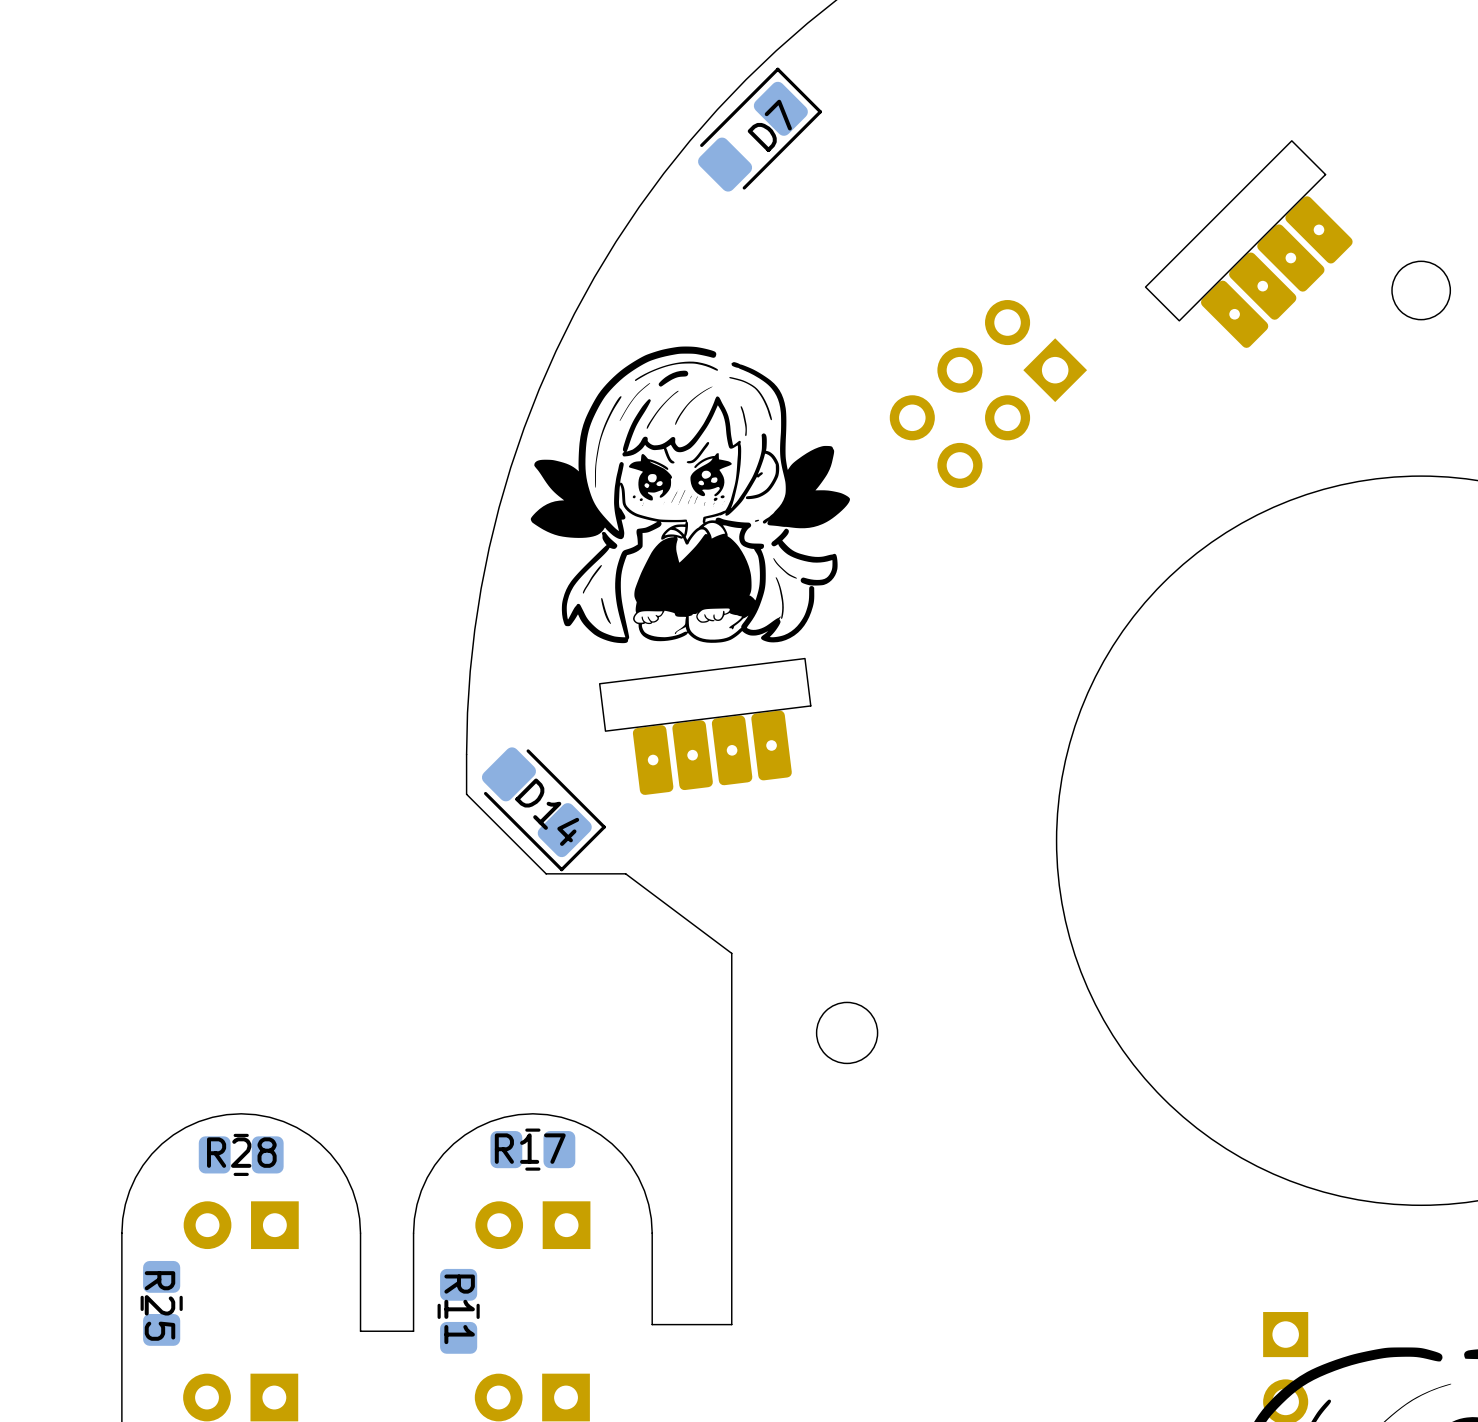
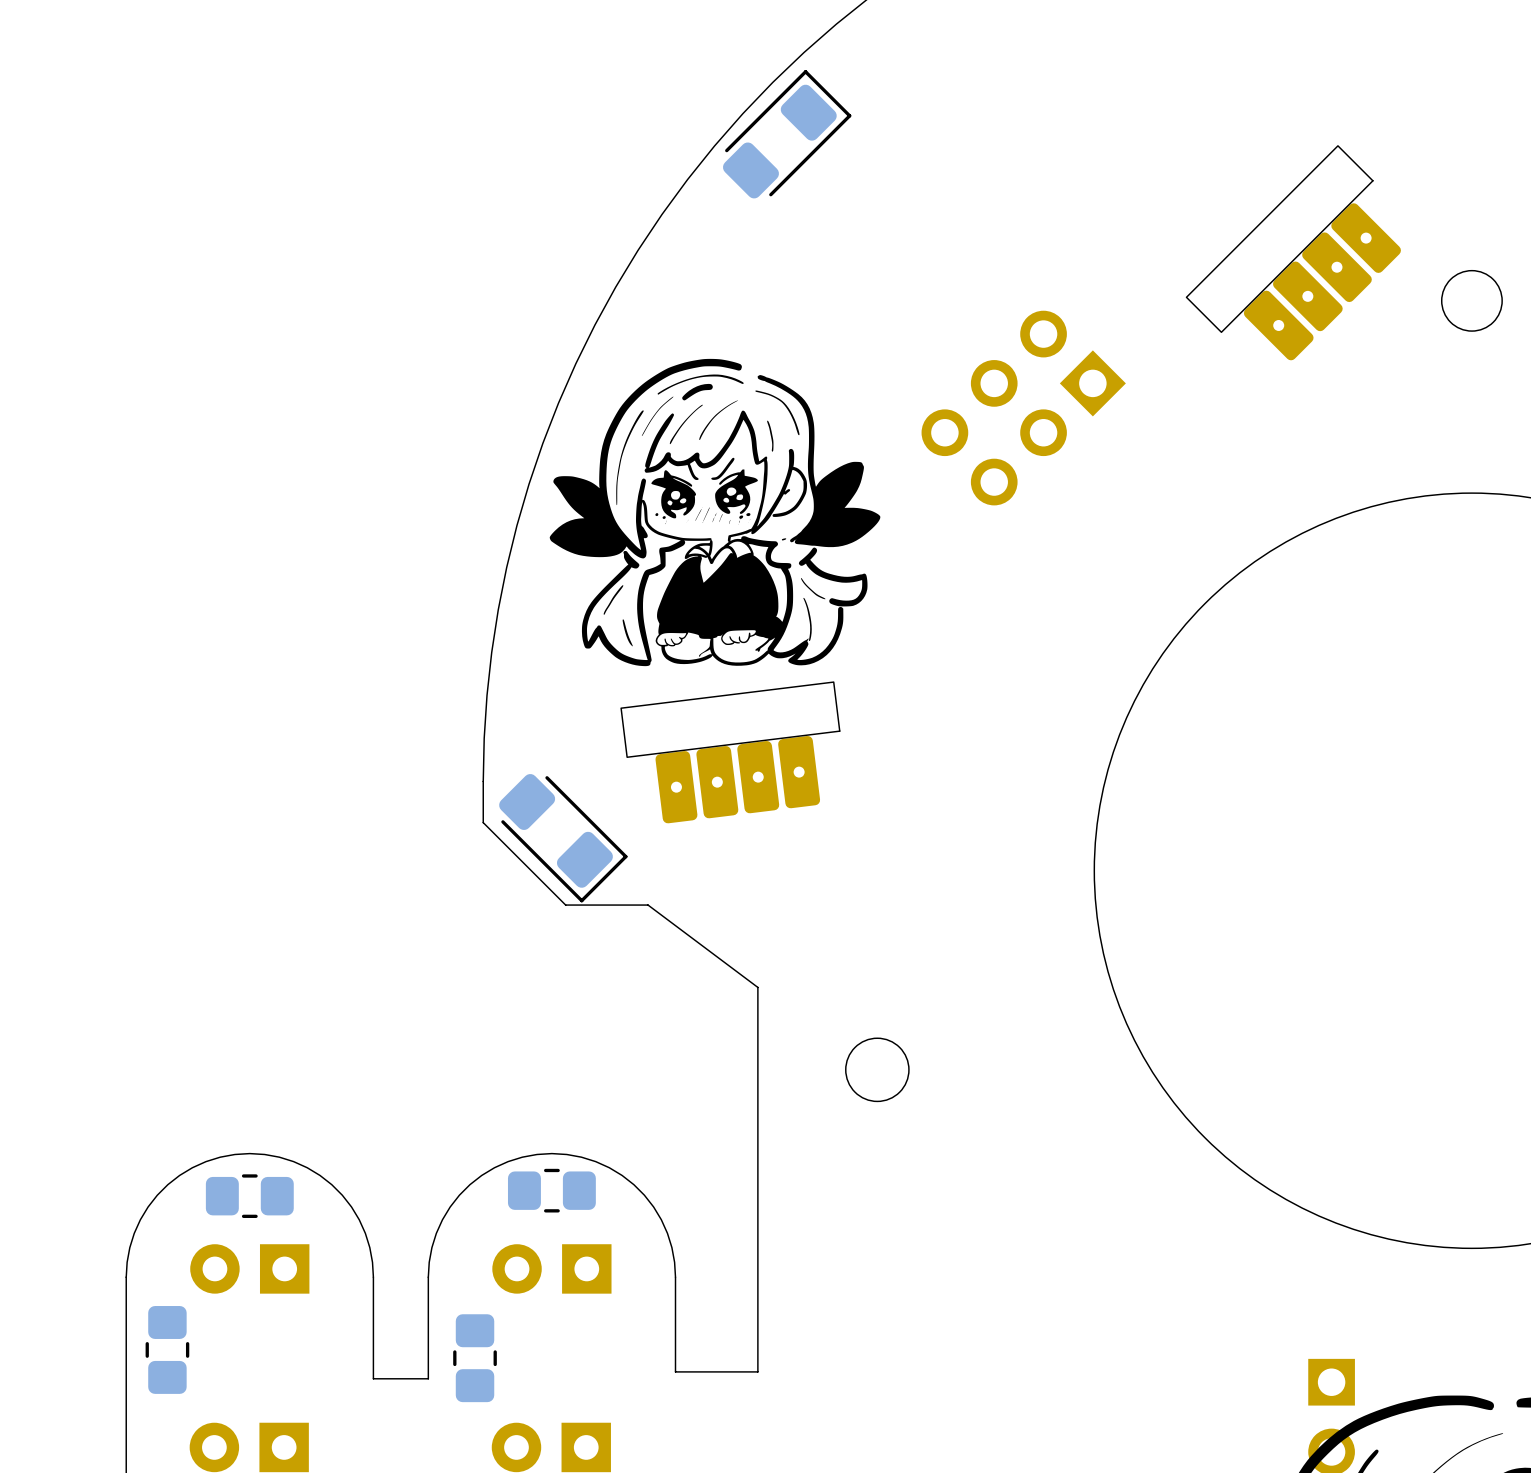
D7 name: D7 (769, 125) -> none
D14 name: D14 (547, 812) -> none
R17 name: R17 (530, 1148) -> none
R28 name: R28 (241, 1152) -> none
R25 name: R25 (159, 1305) -> none
R11 name: R11 (459, 1309) -> none

